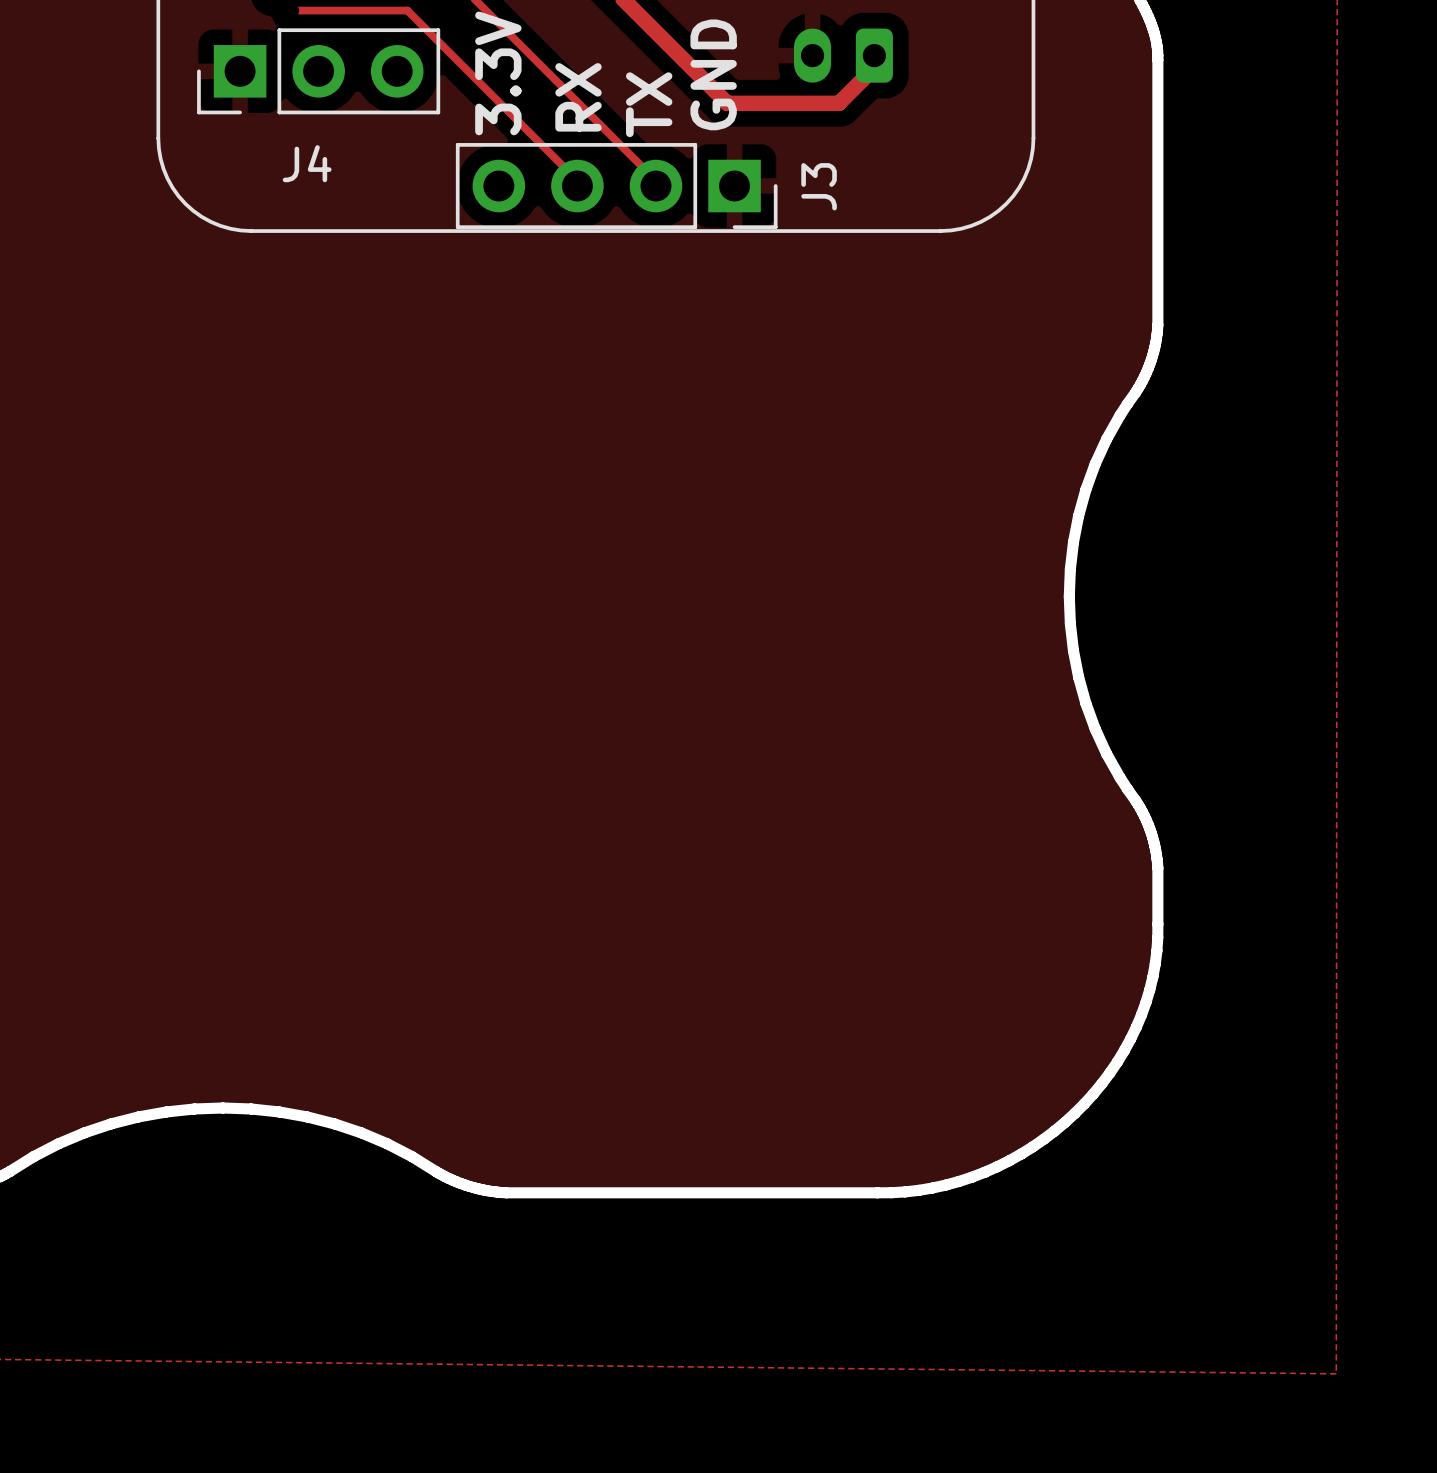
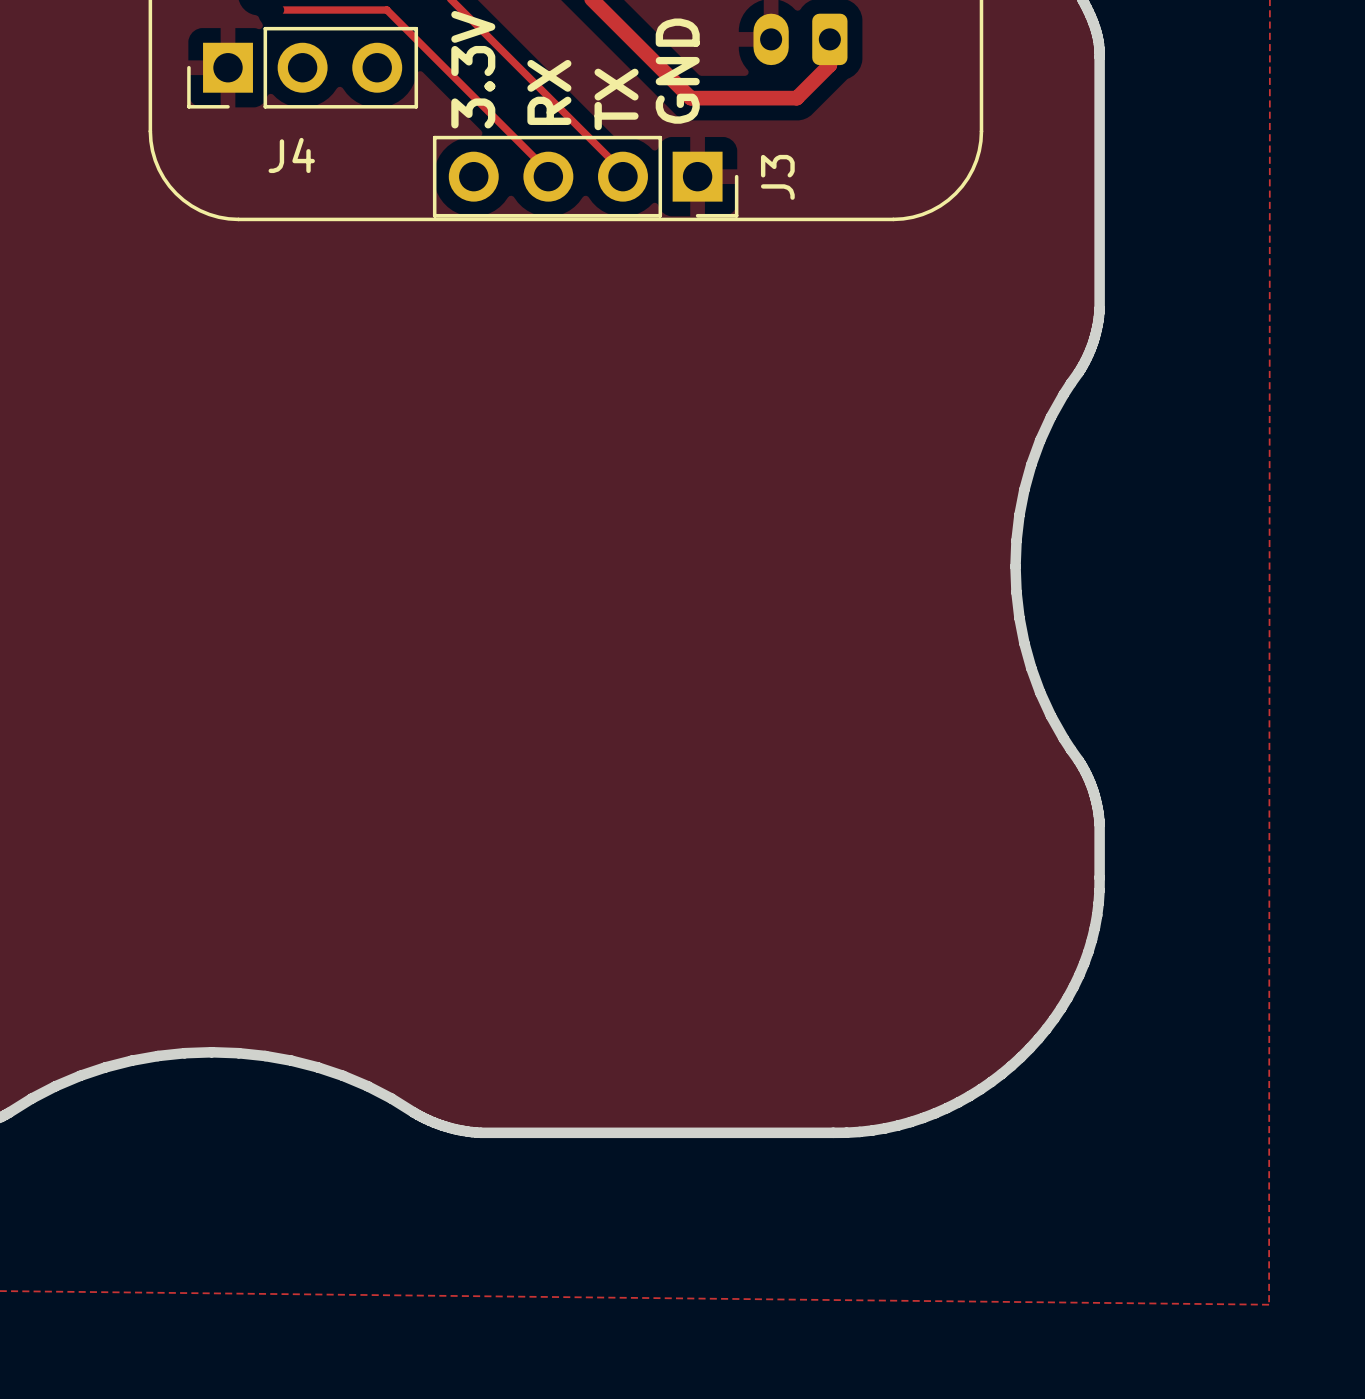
part position: (843, 55) -> (800, 39)

